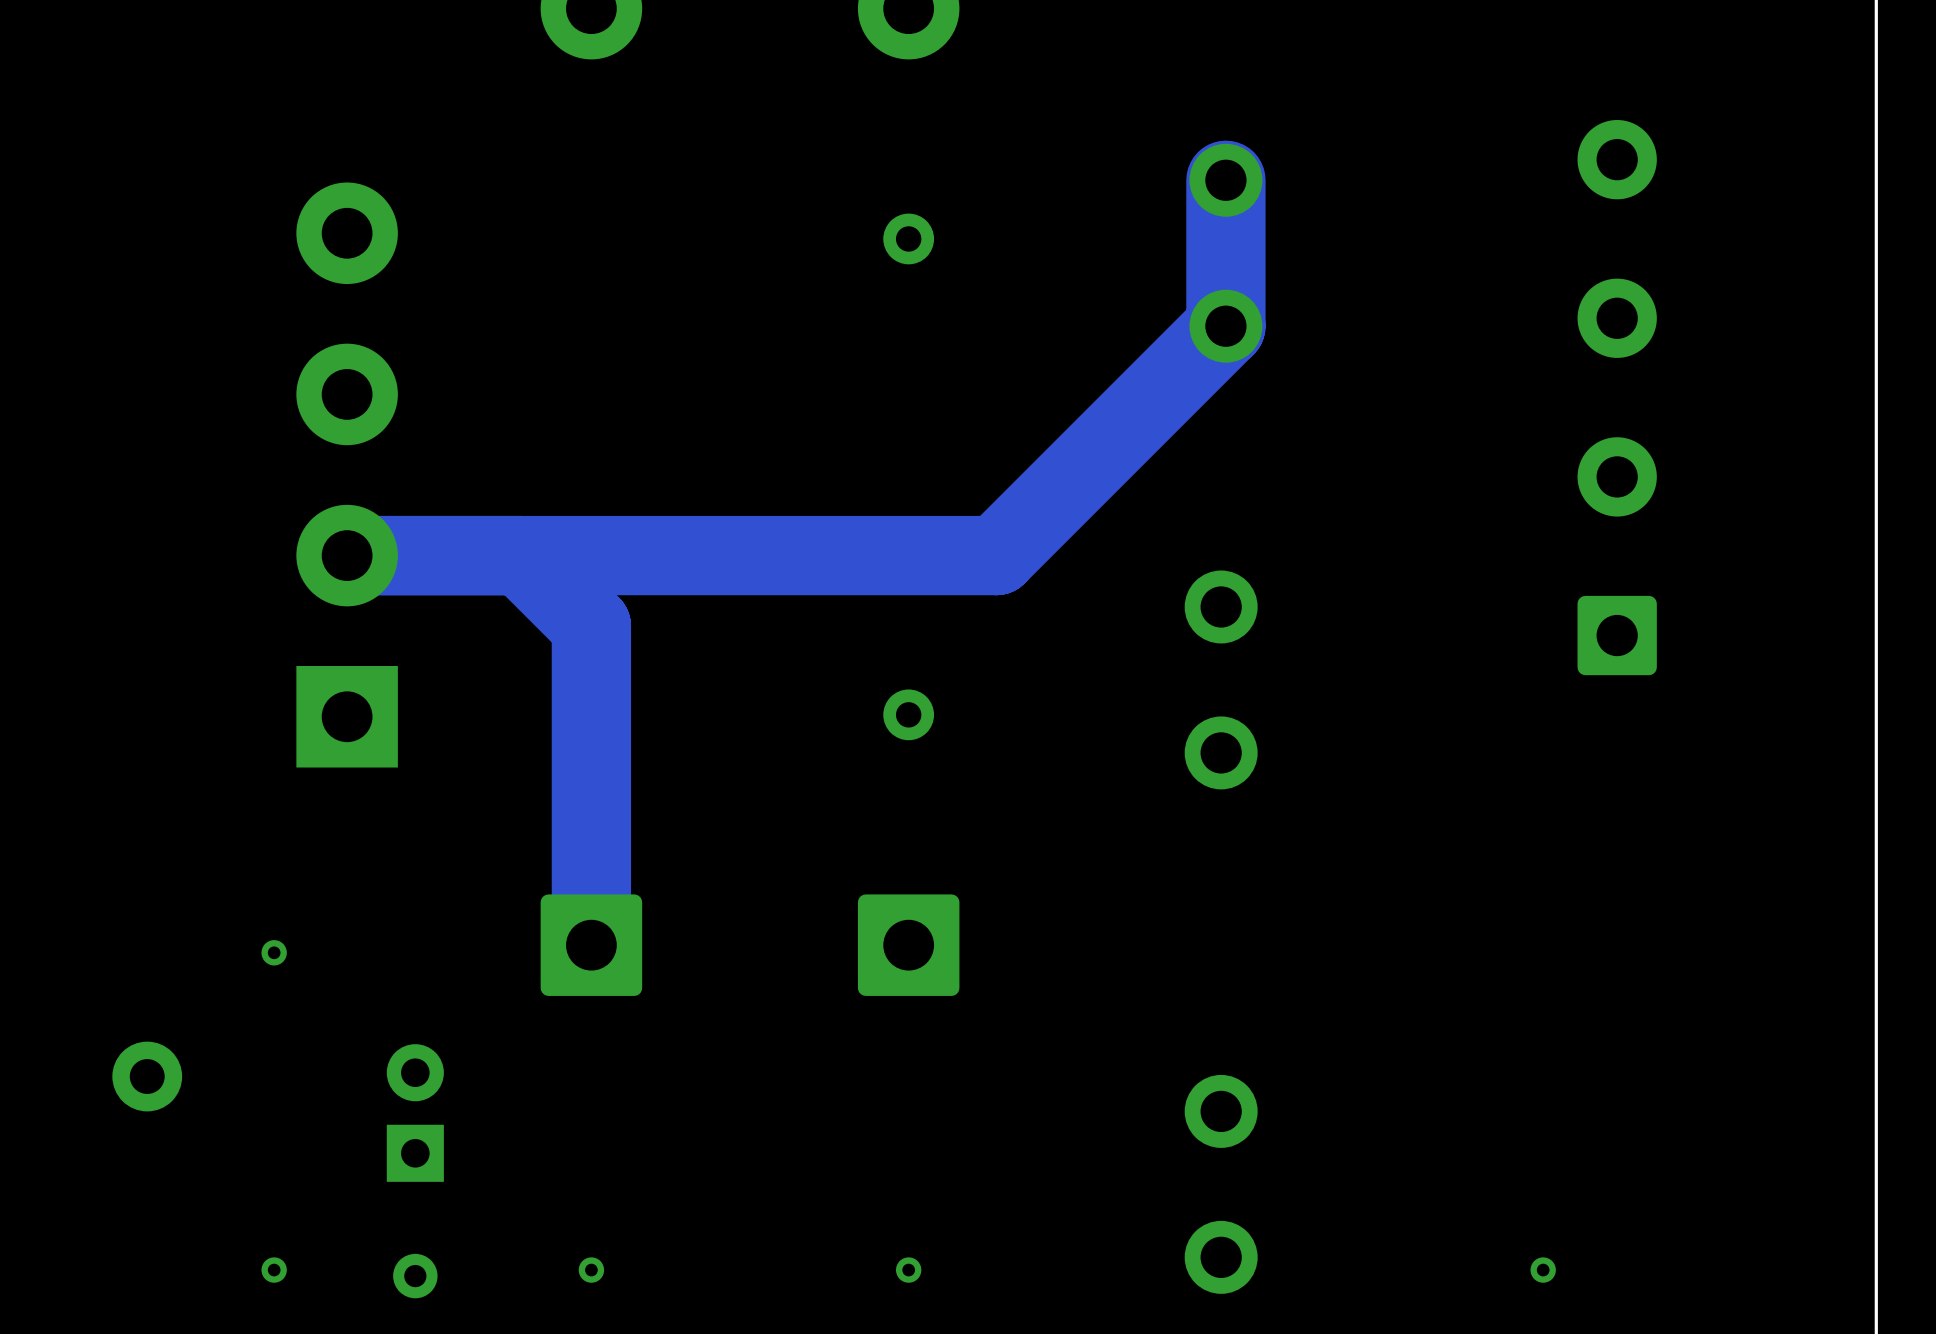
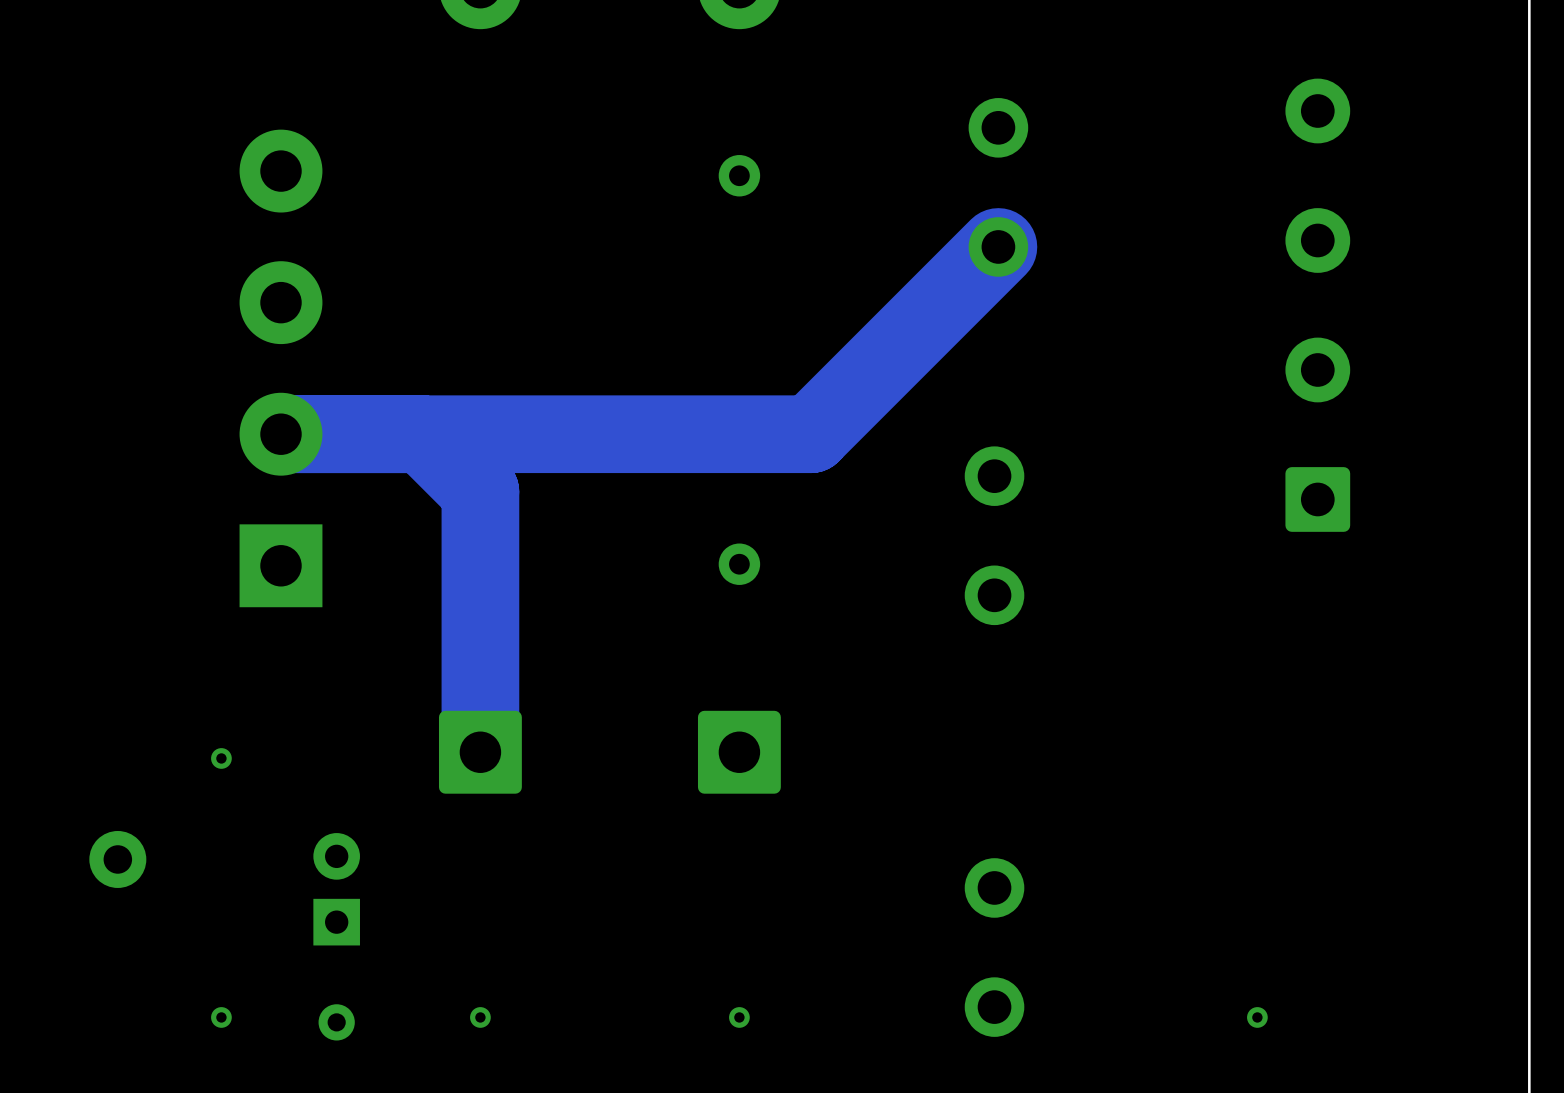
track: (1225, 180) (1225, 326) -> none
track width: thin (1225, 326) (996, 555) (347, 555) -> thick (998, 246) (811, 434) (281, 434)
track width: thin (520, 555) (591, 626) (591, 945) -> thick (422, 434) (480, 491) (480, 752)

